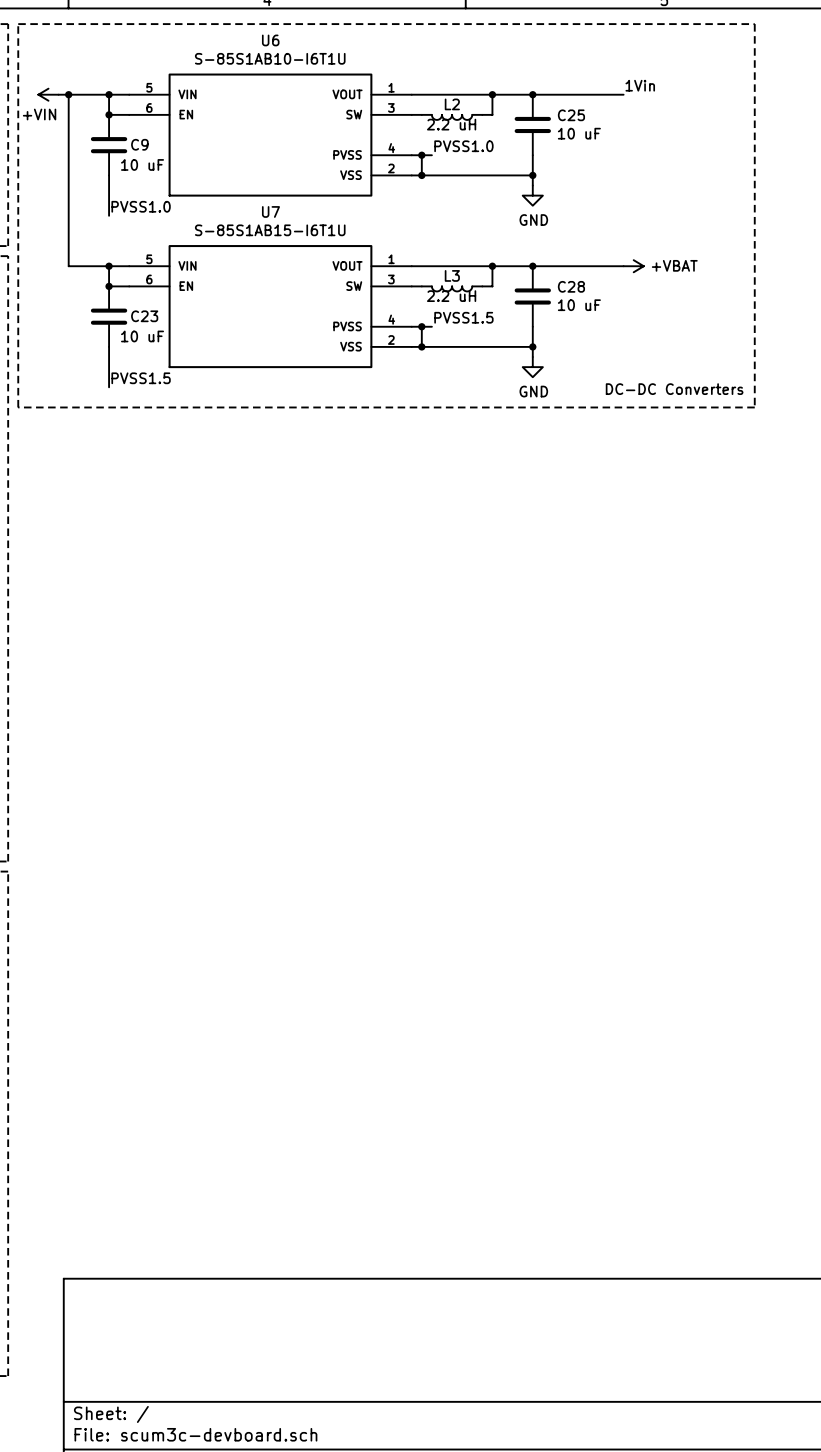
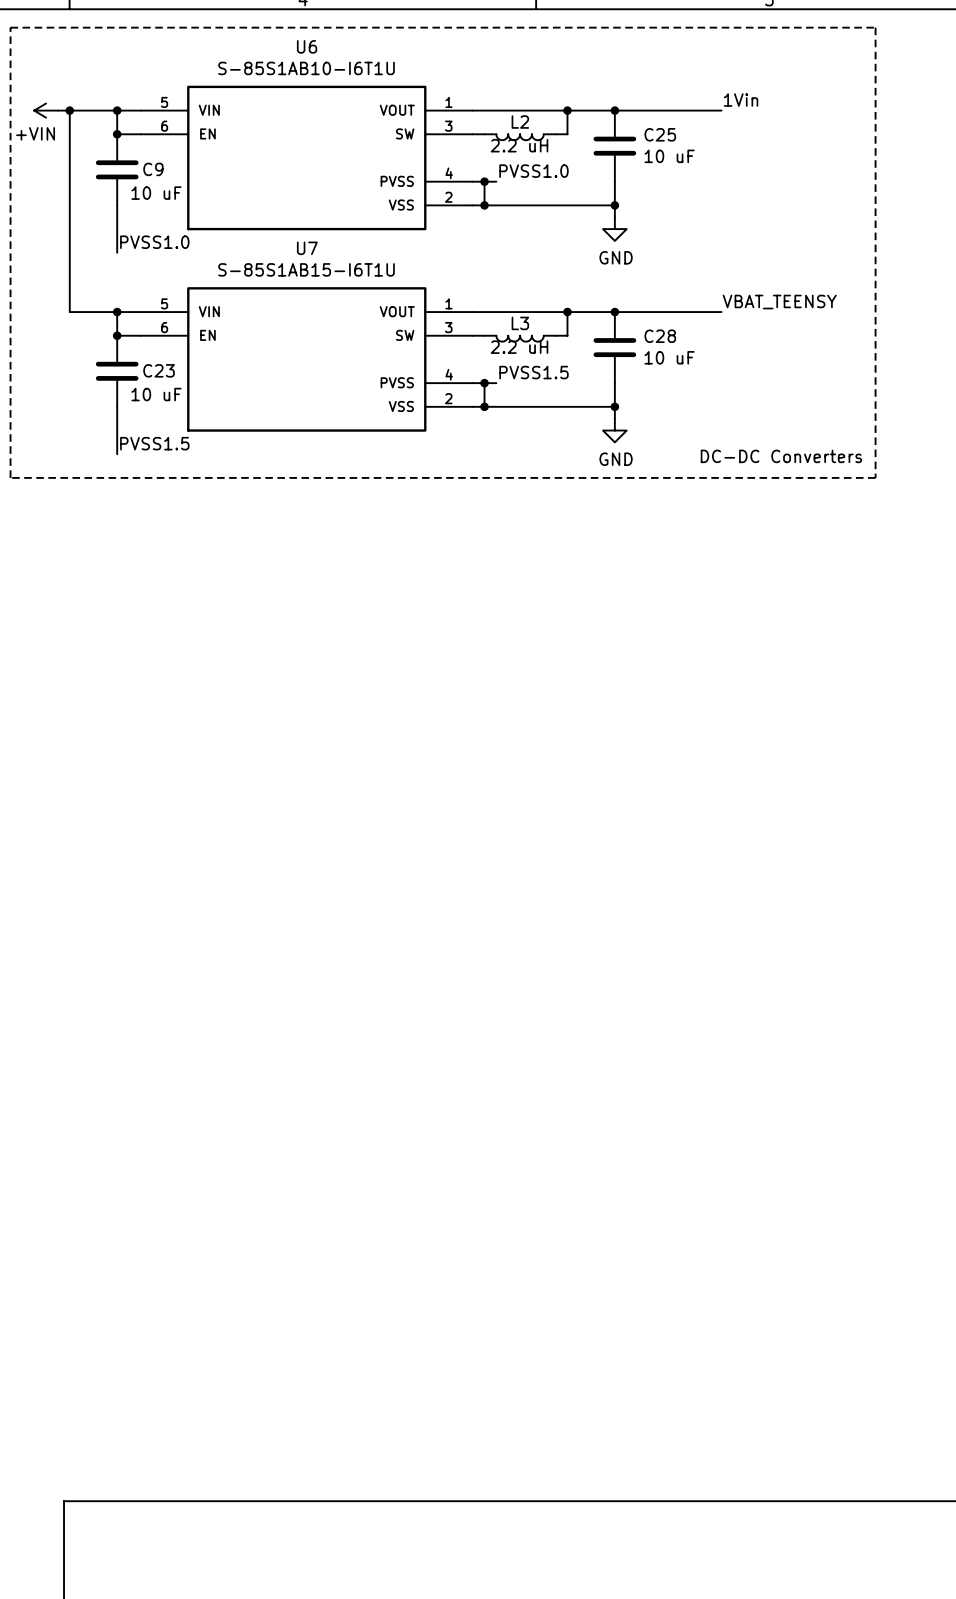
label: none -> VBAT_TEENSY (779, 302)
power symbol: +VBAT (633, 266) -> none

